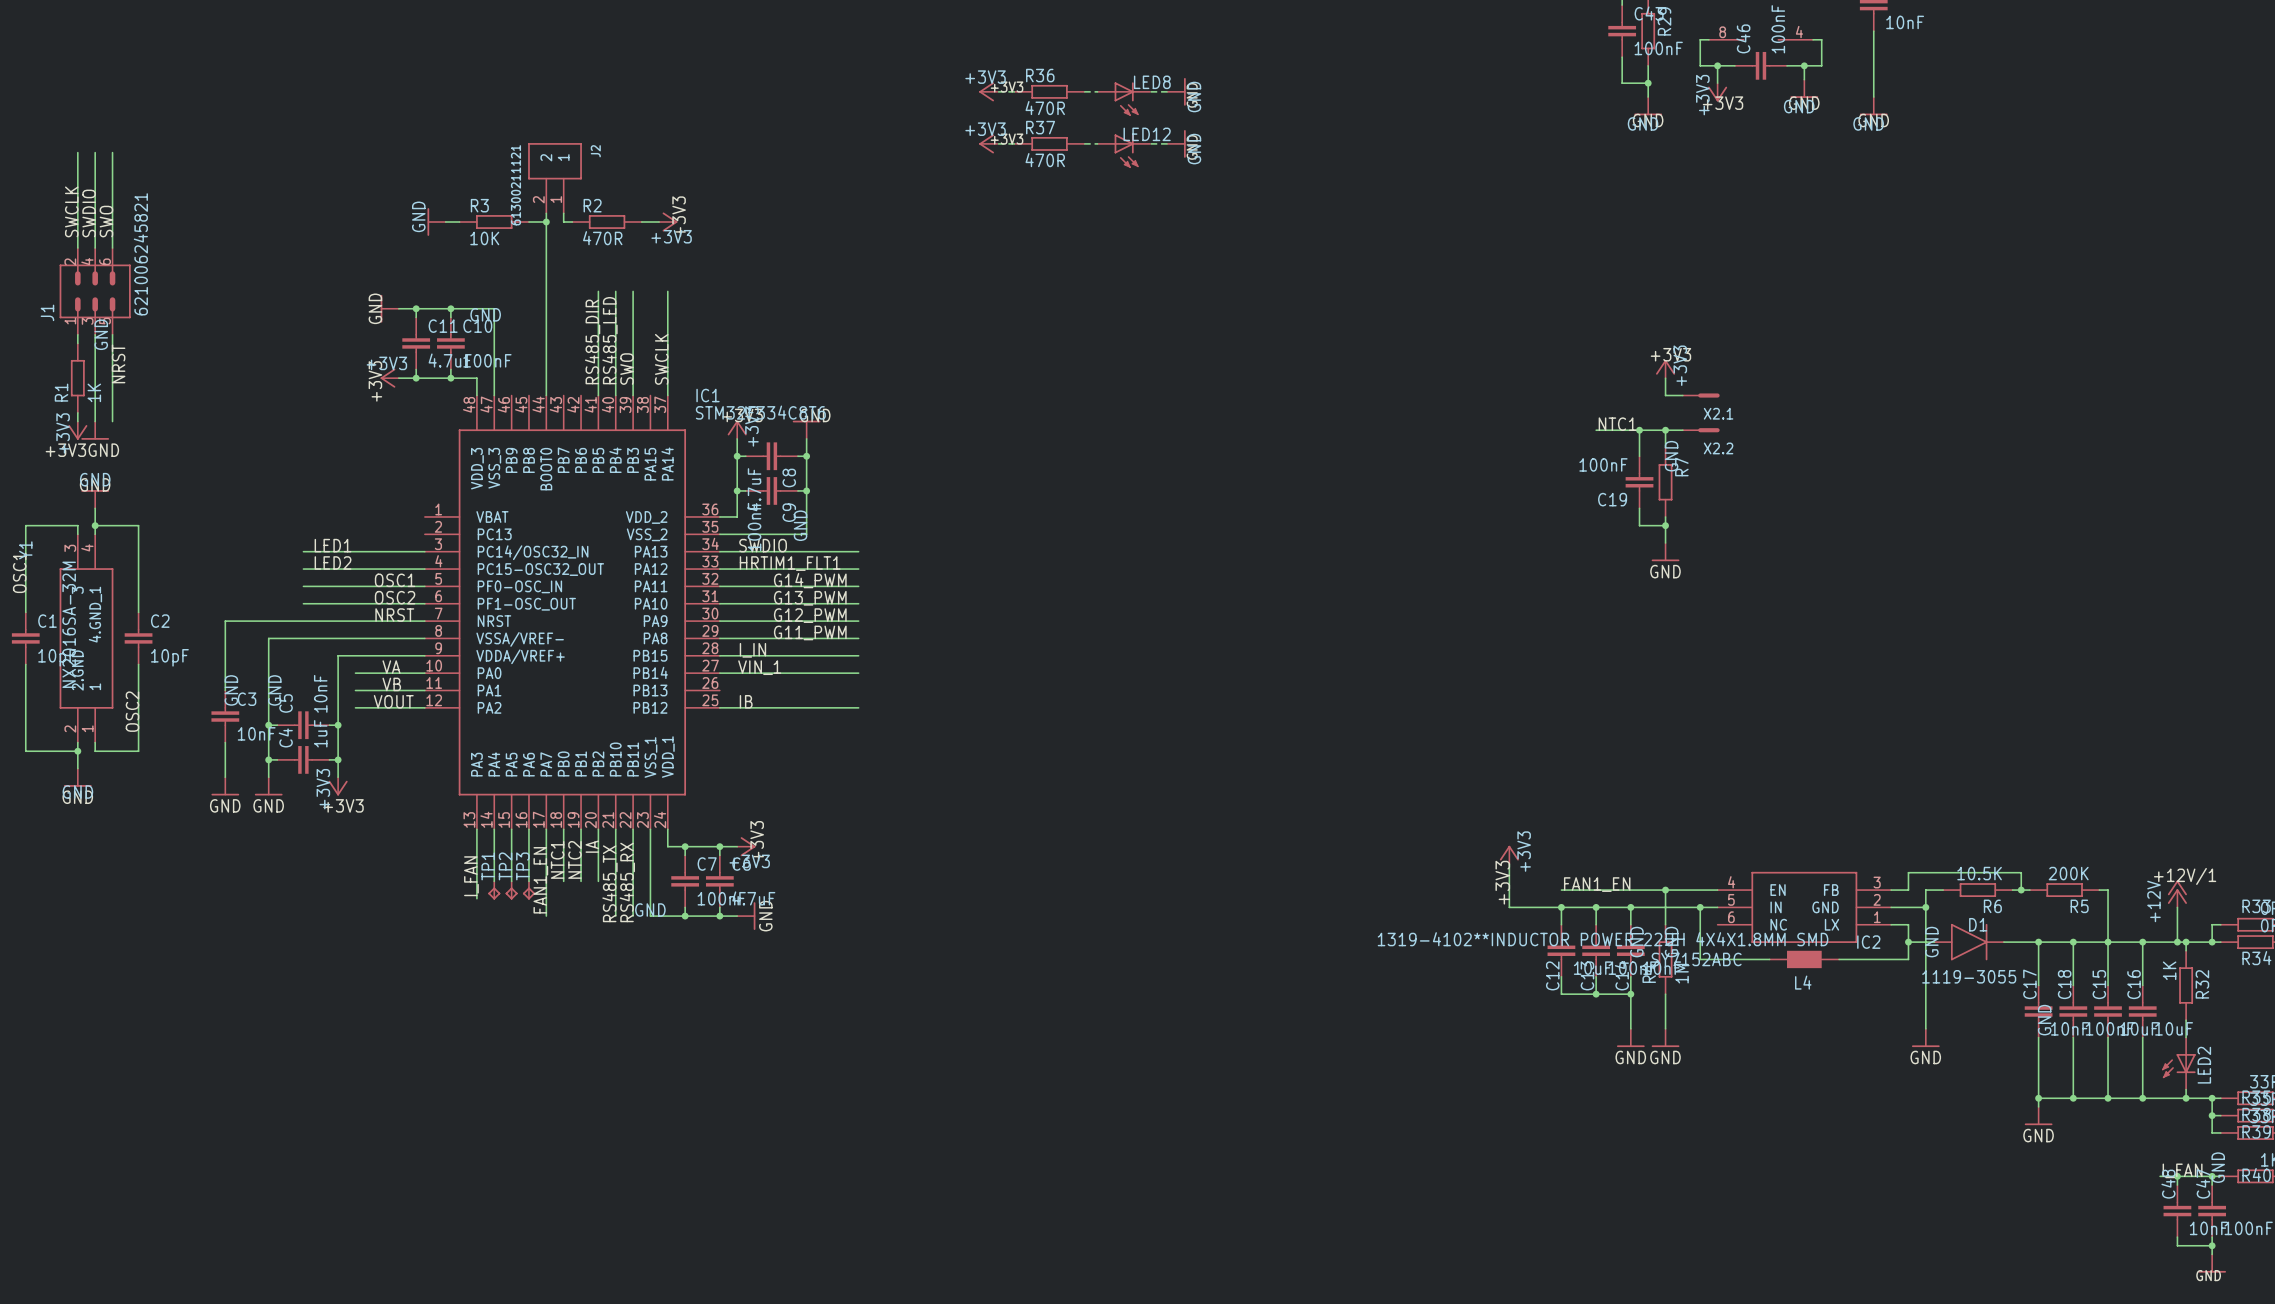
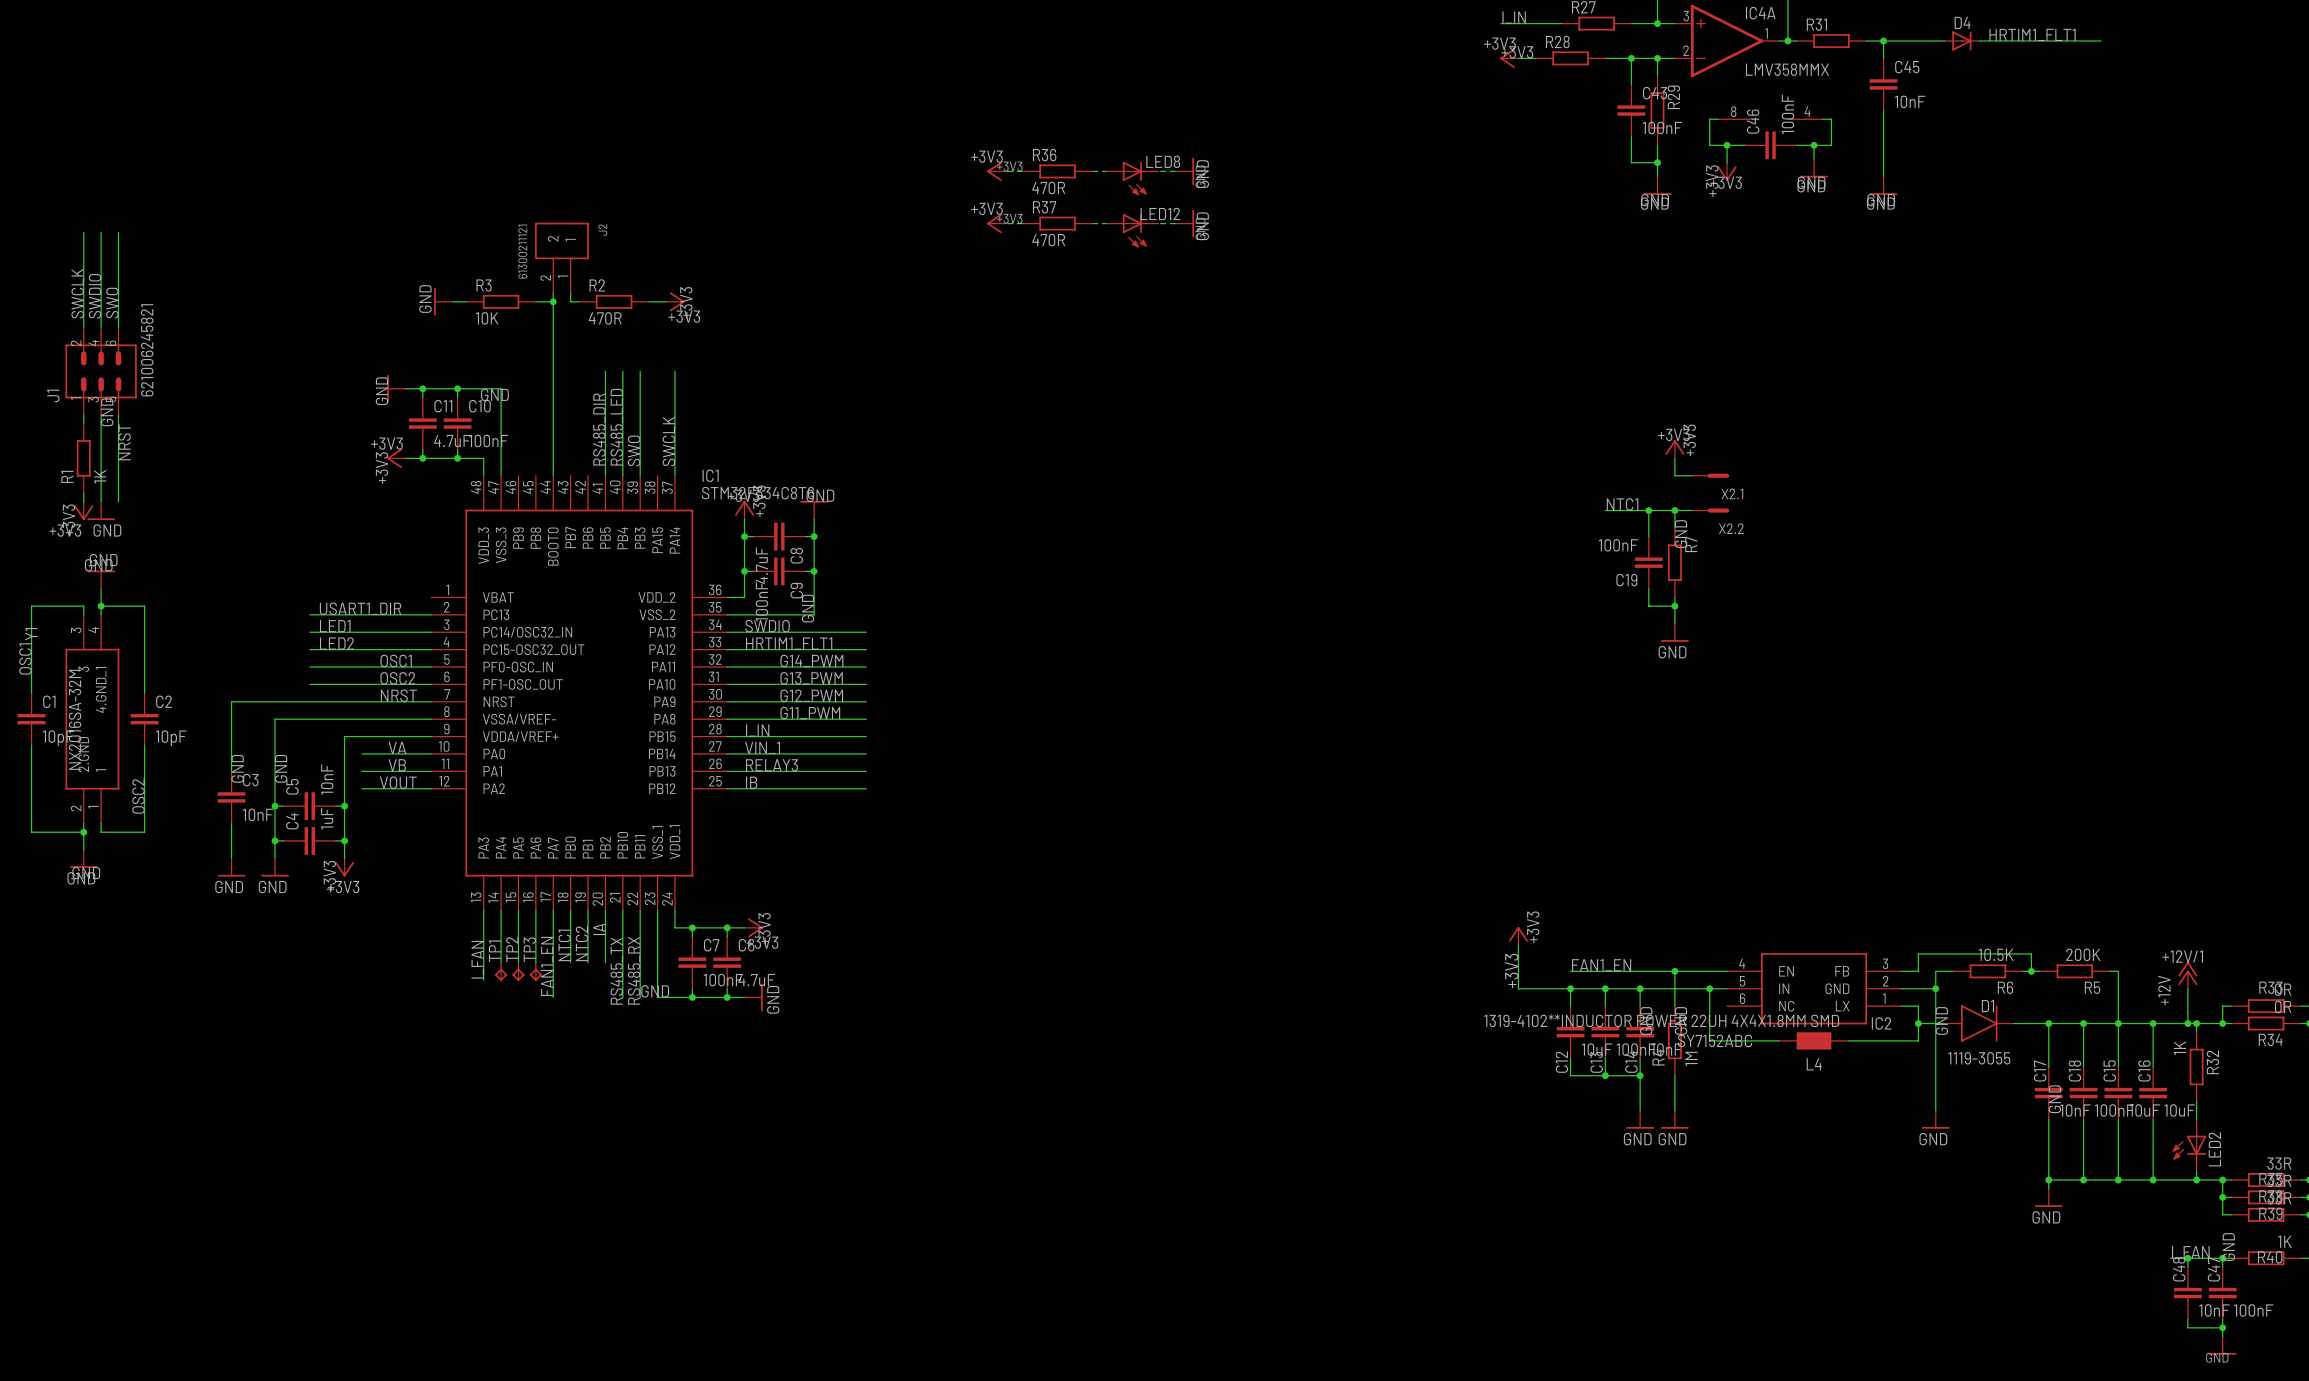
label: none -> USART1_DIR (360, 608)
wire: none -> (309, 614) (431, 614)
label: none -> RELAY3 (771, 765)
wire: none -> (727, 771) (866, 771)

